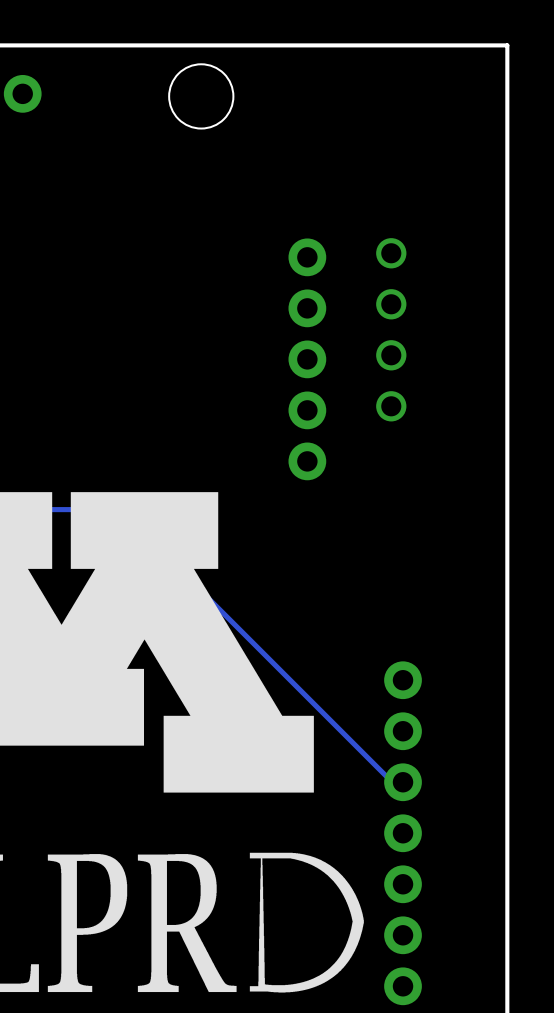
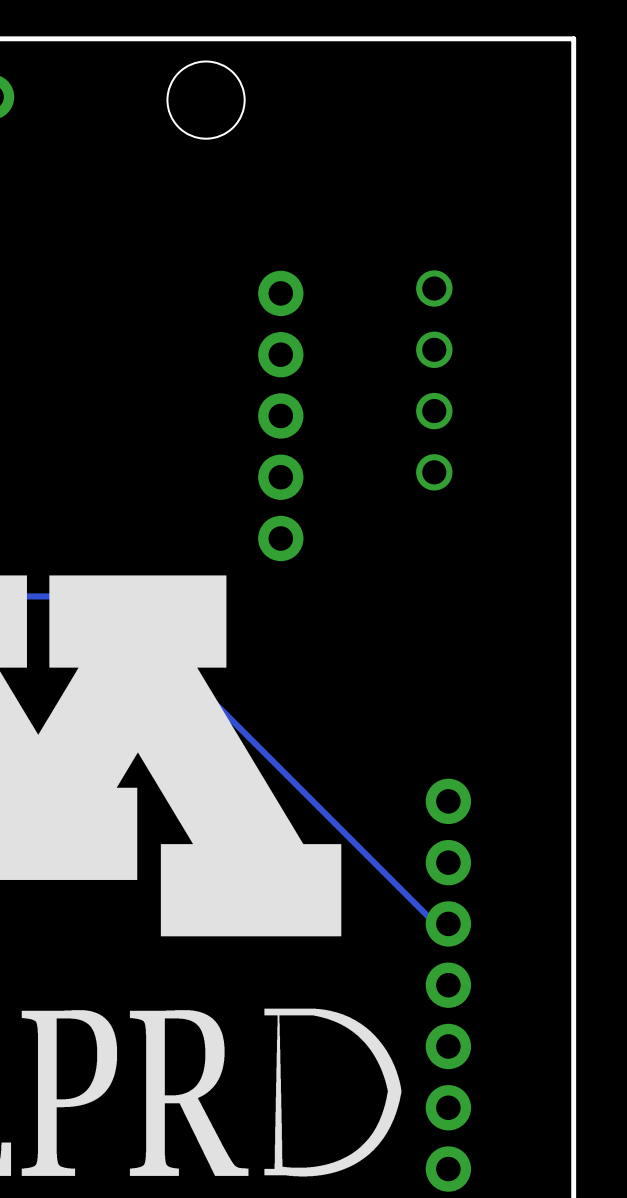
part position: (307, 359) -> (280, 415)

